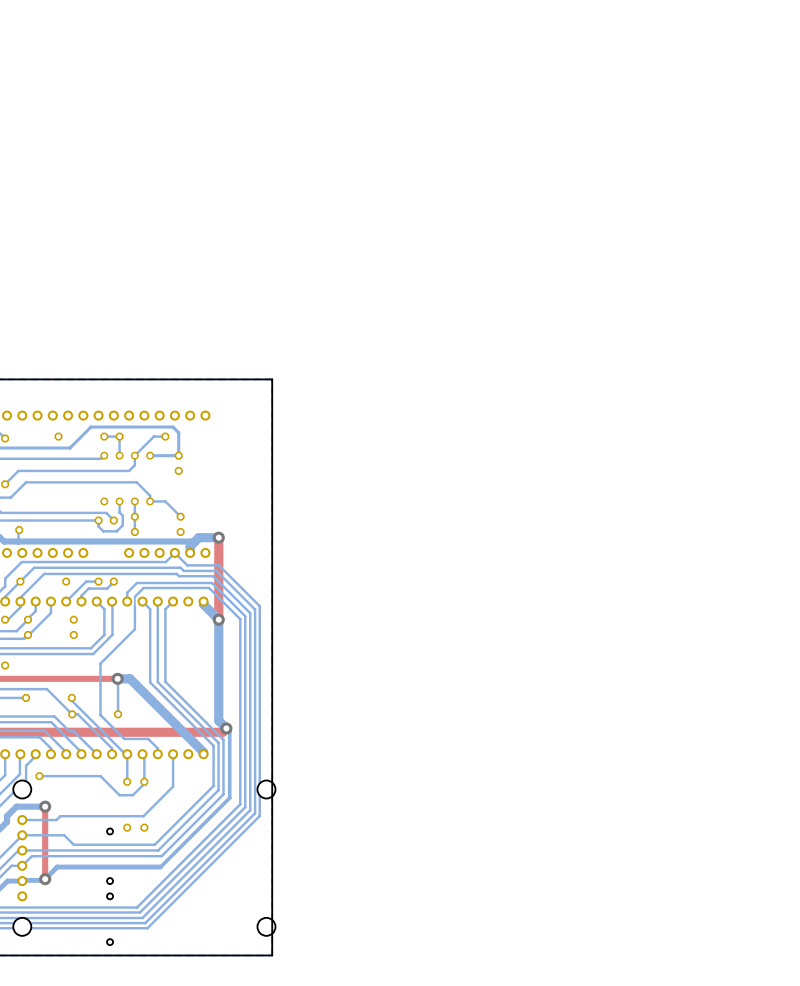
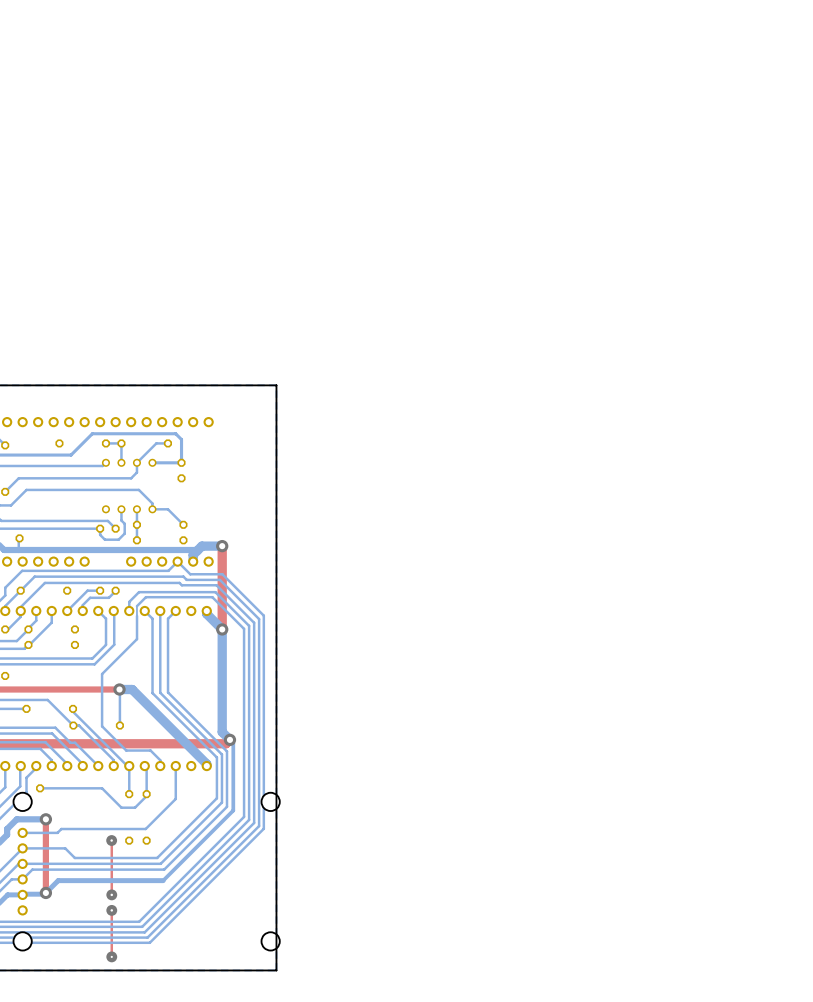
top track: none -> (111, 840) (111, 894)
via: none -> (111, 840)
hole: (110, 831) -> none
hole: (110, 881) -> none
via: none -> (111, 894)
top track: none -> (111, 910) (111, 956)
hole: (110, 896) -> none
via: none -> (111, 910)
hole: (110, 942) -> none
via: none -> (111, 956)

